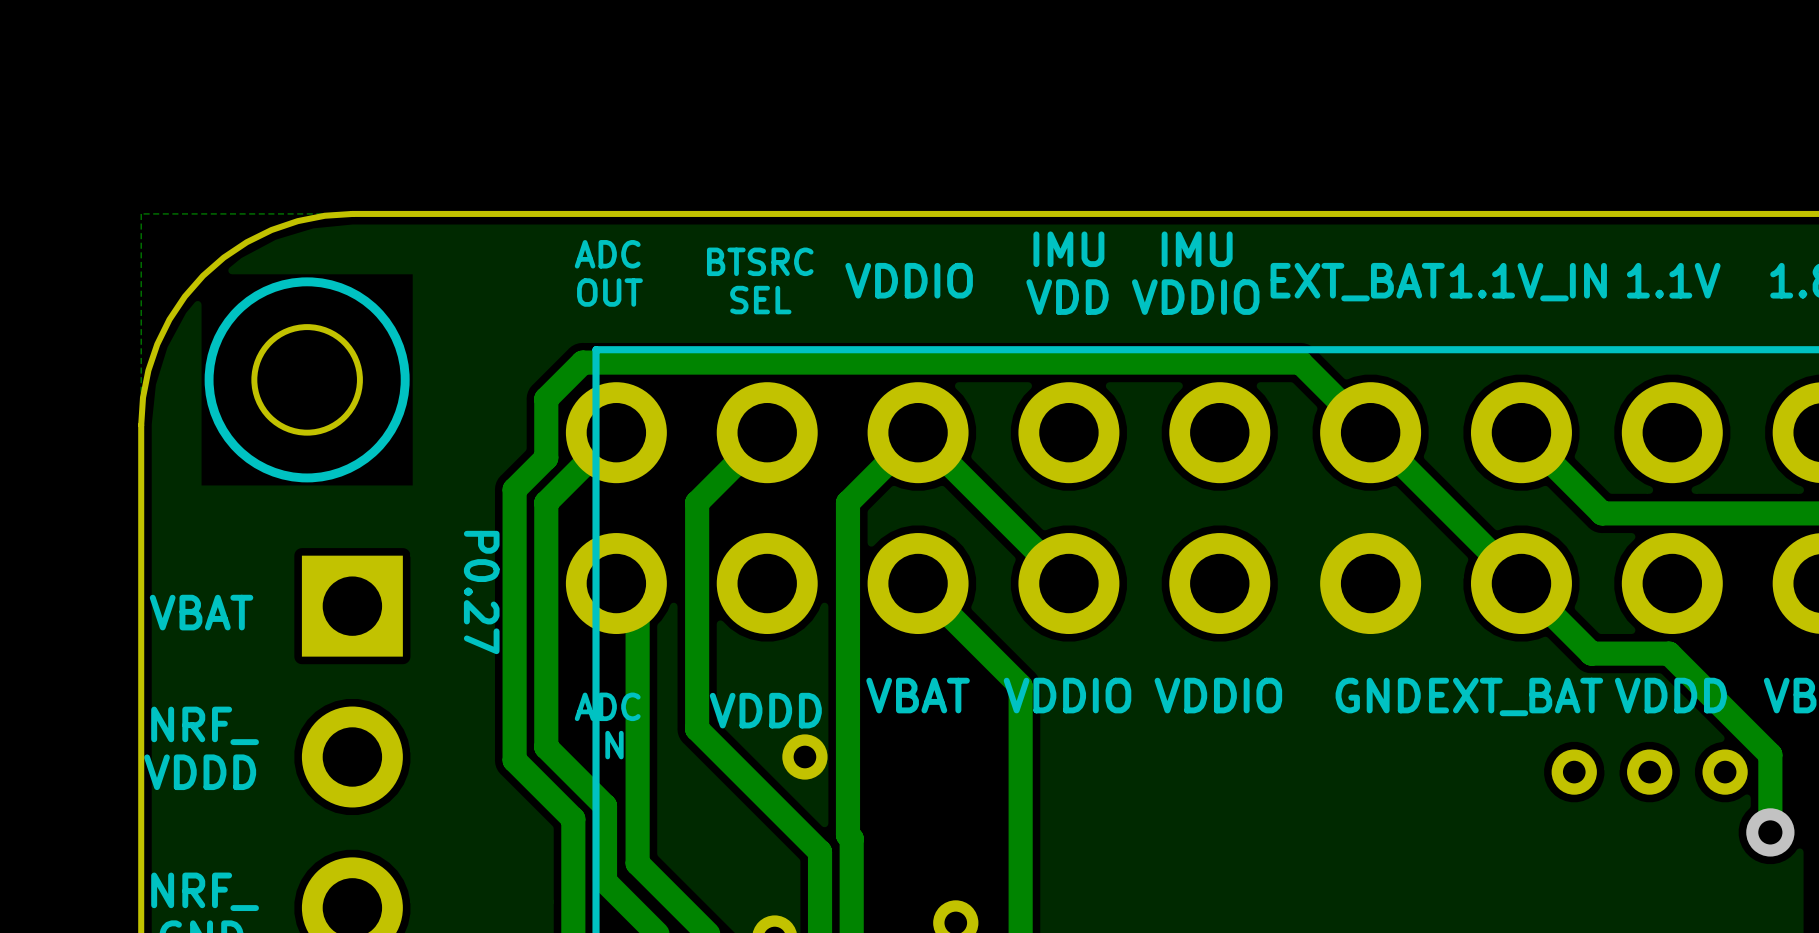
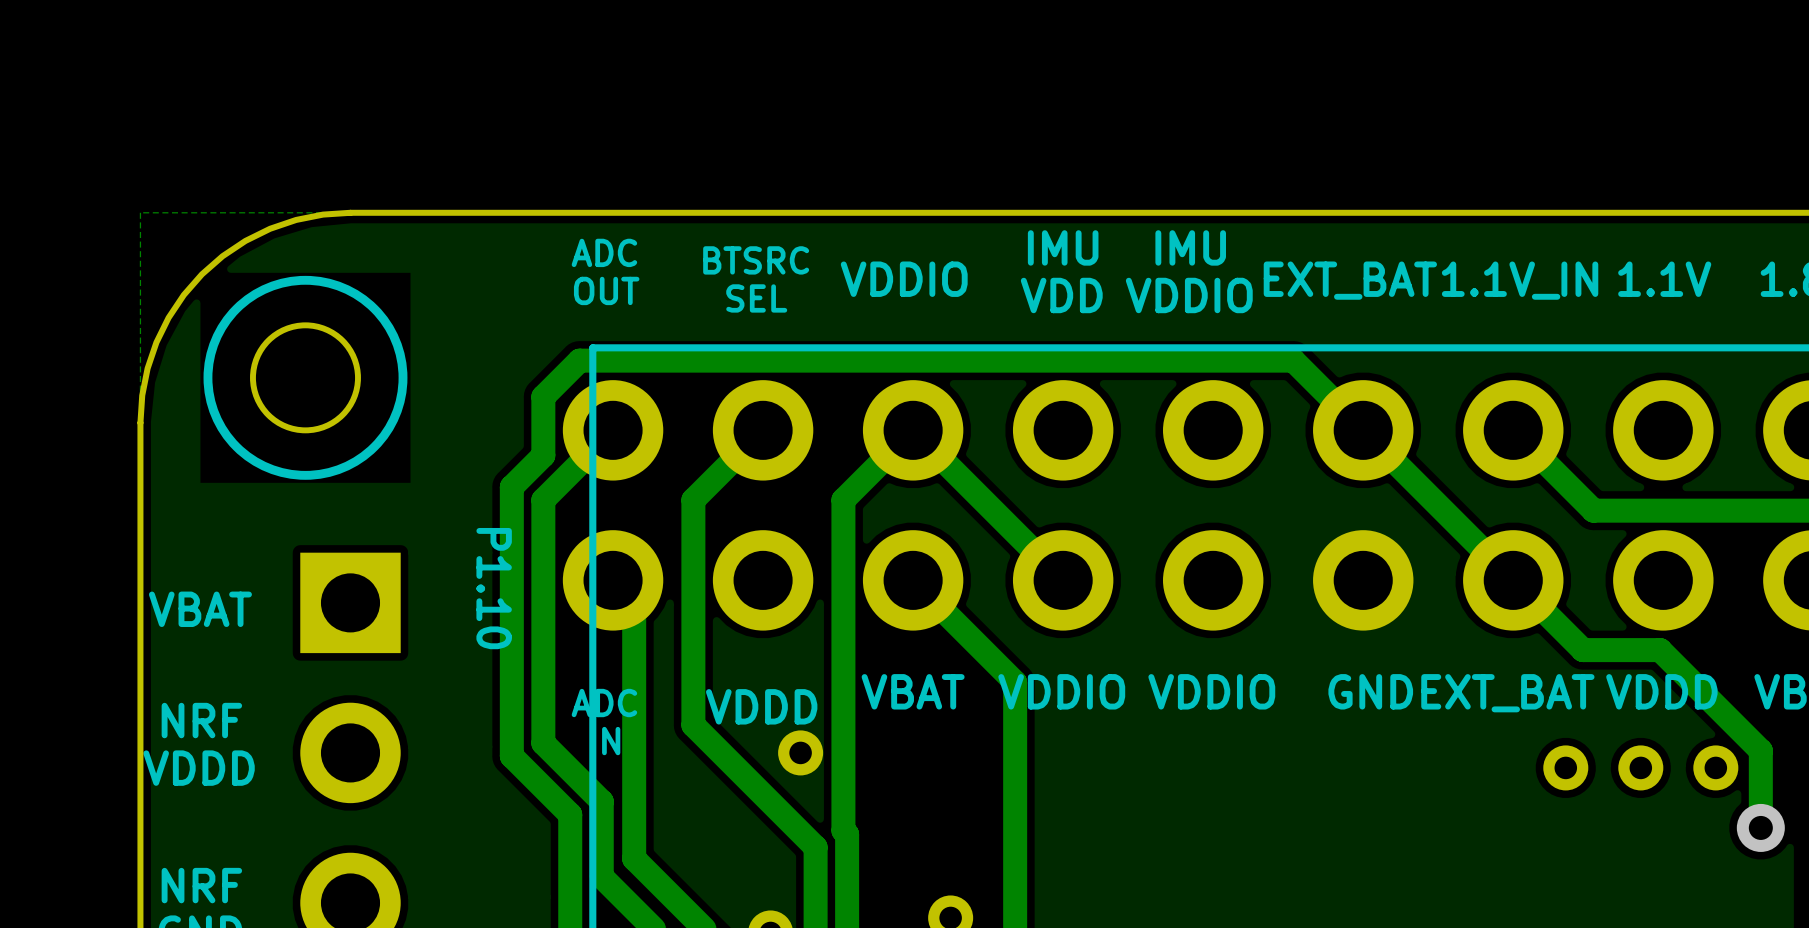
text: P0.27 (481, 592) -> P1.10 (494, 588)
text: NRF_ (205, 725) -> NRF (201, 720)
text: NRF_ (205, 891) -> NRF (201, 885)

